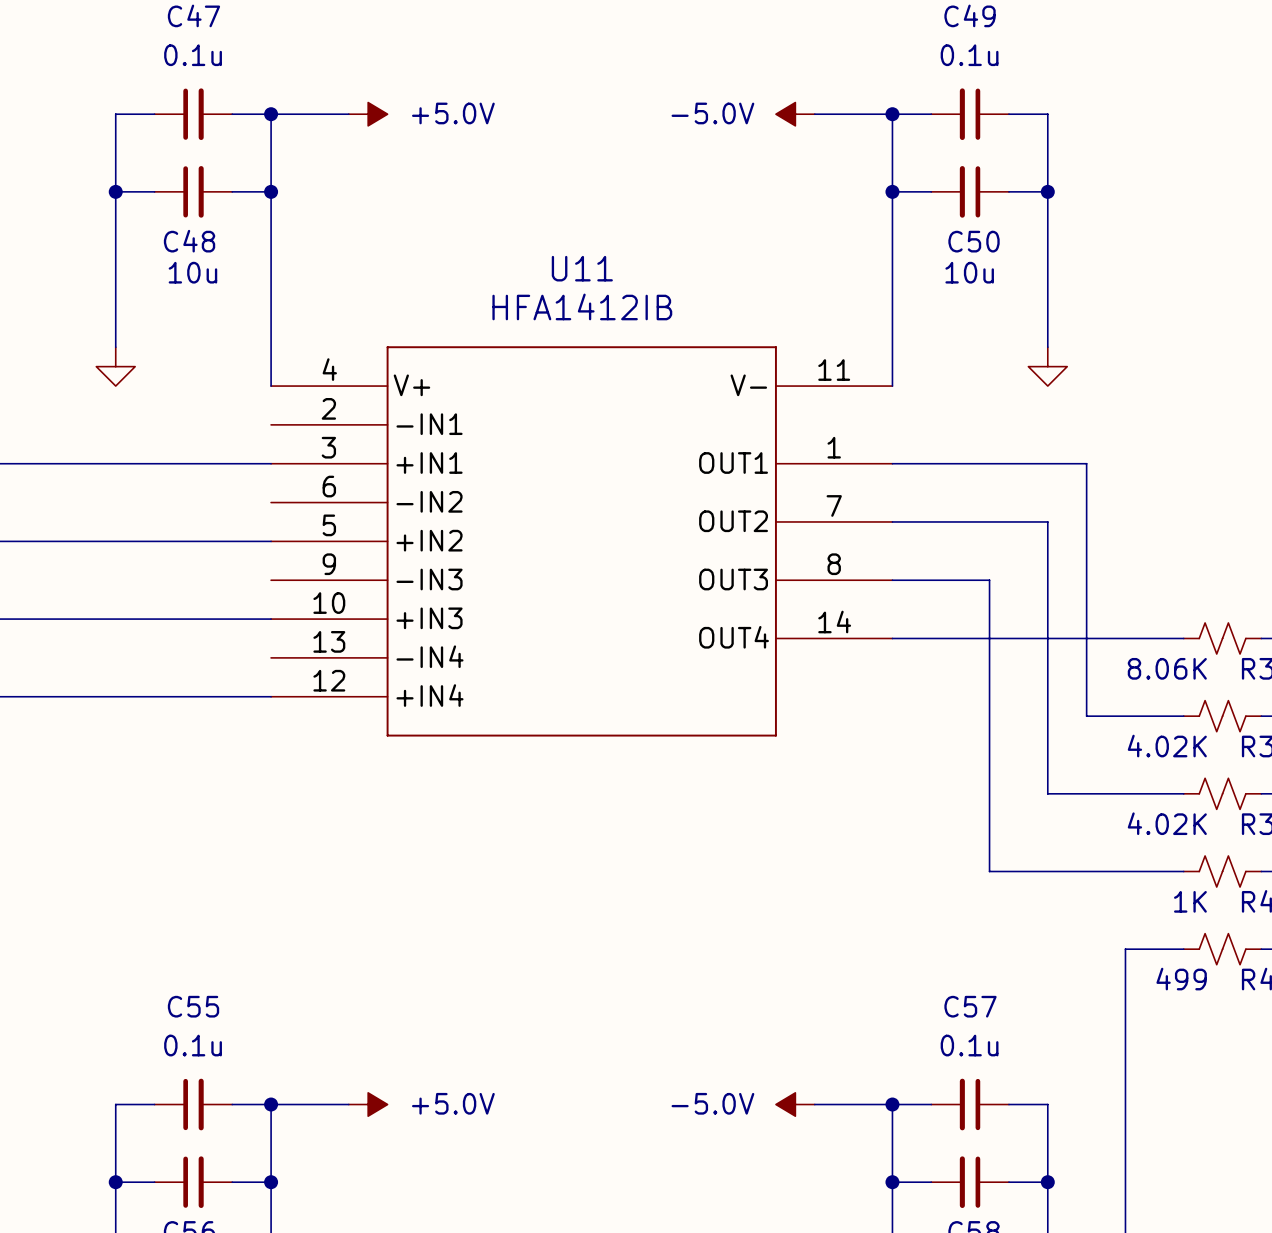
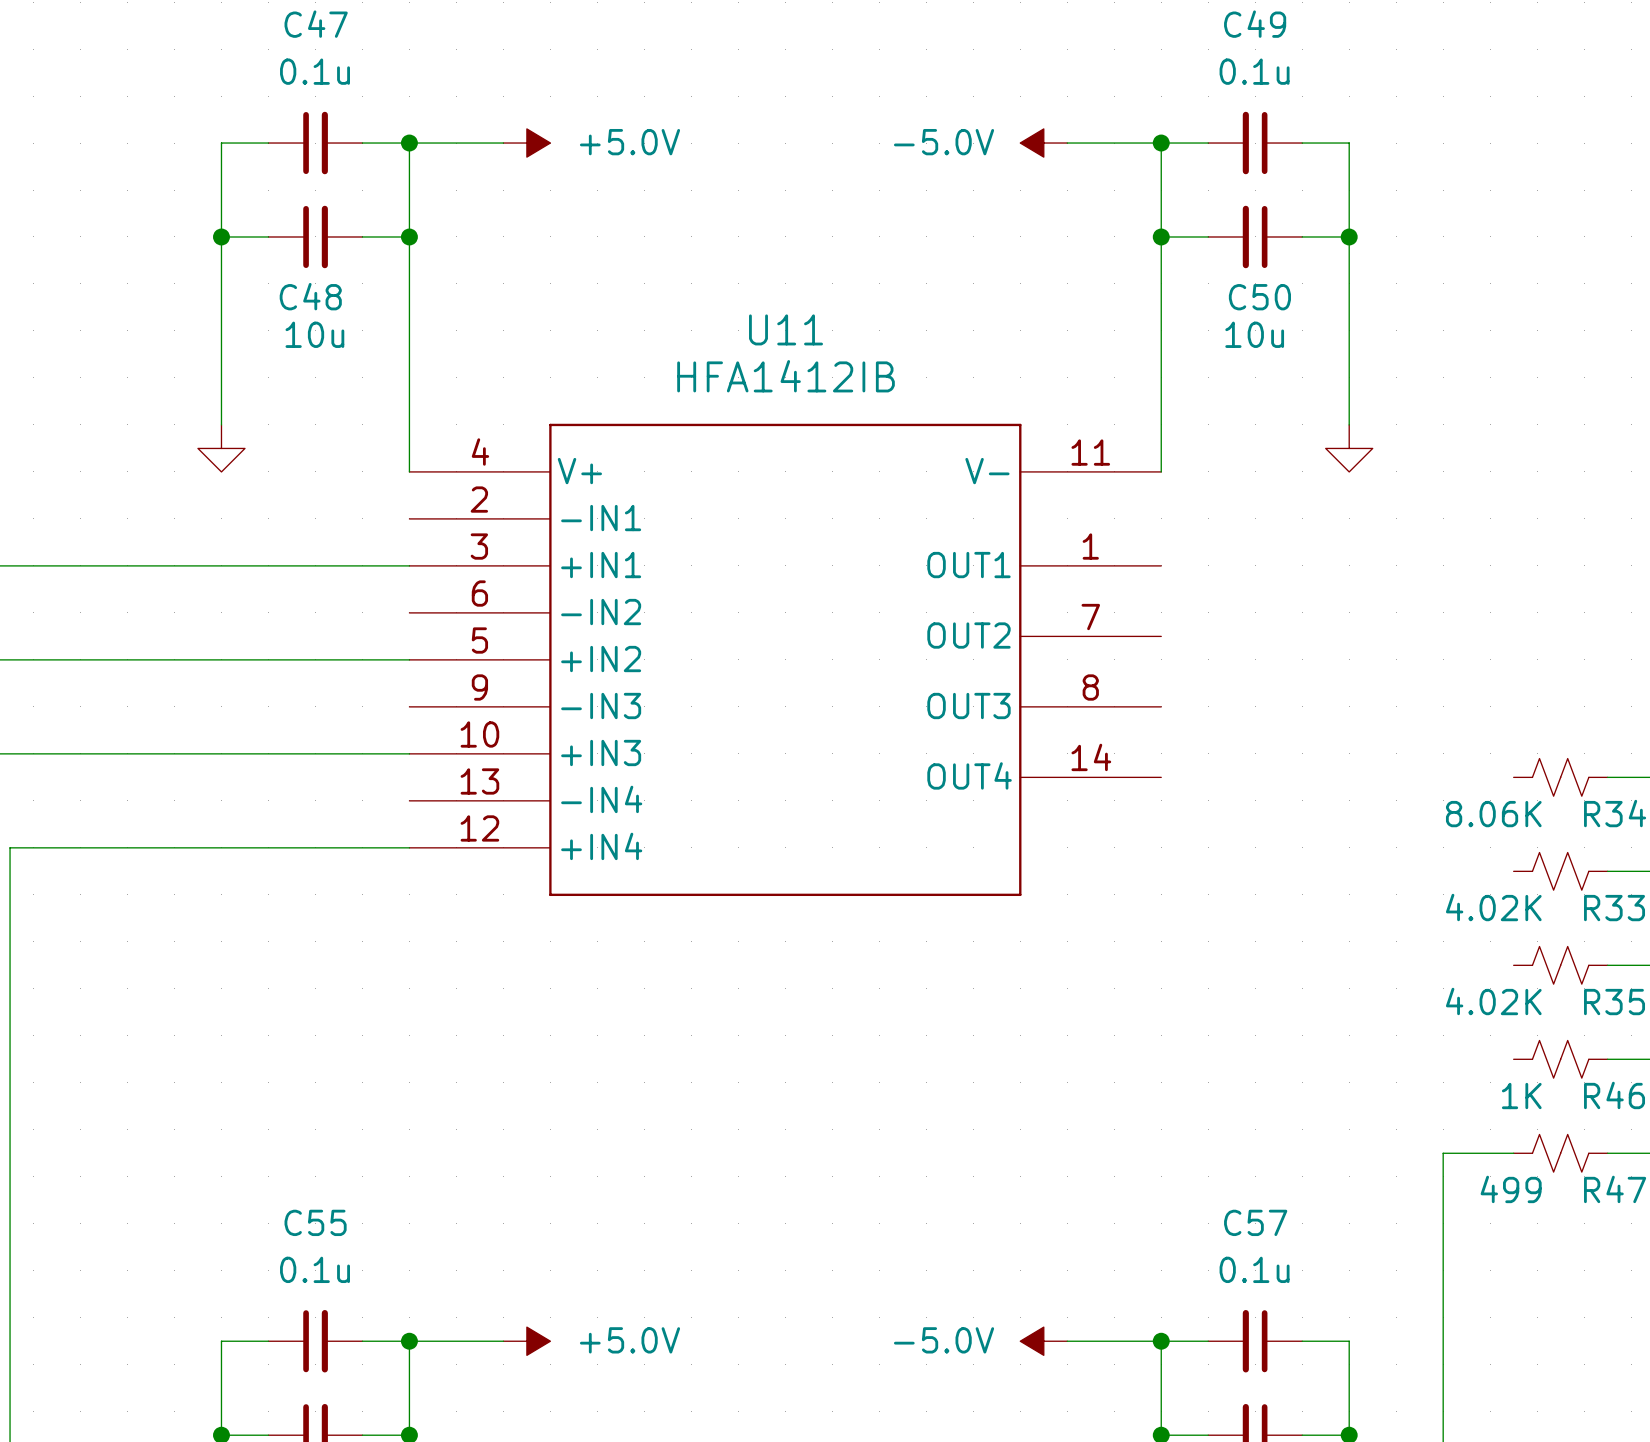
wire: (892, 463) (1086, 463) (1086, 716) (1183, 716) -> none
wire: (892, 521) (1047, 521) (1047, 793) (1183, 793) -> none
wire: (892, 580) (989, 580) (989, 871) (1183, 871) -> none
wire: (892, 638) (1183, 638) -> none

